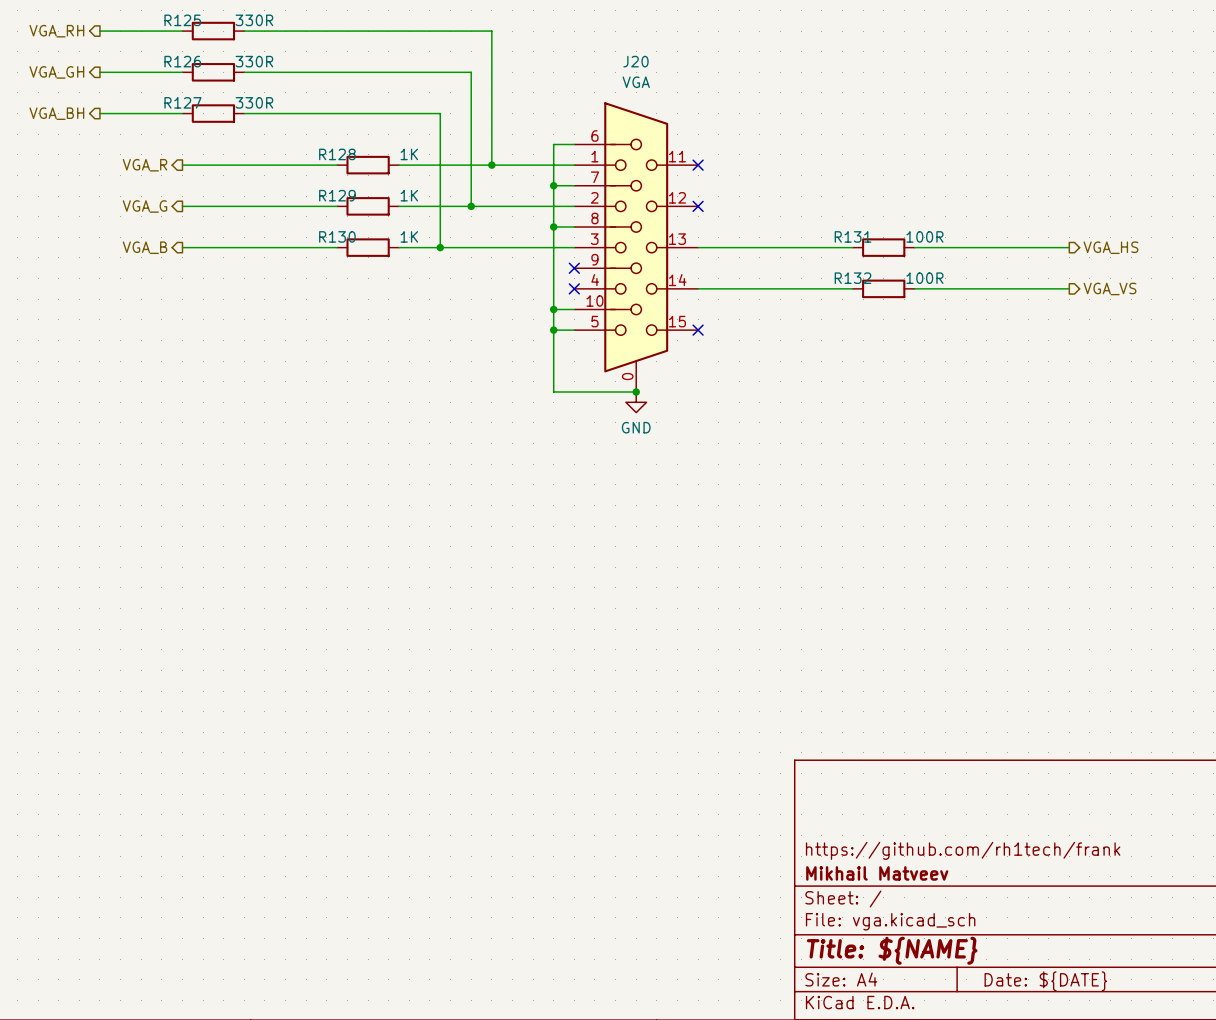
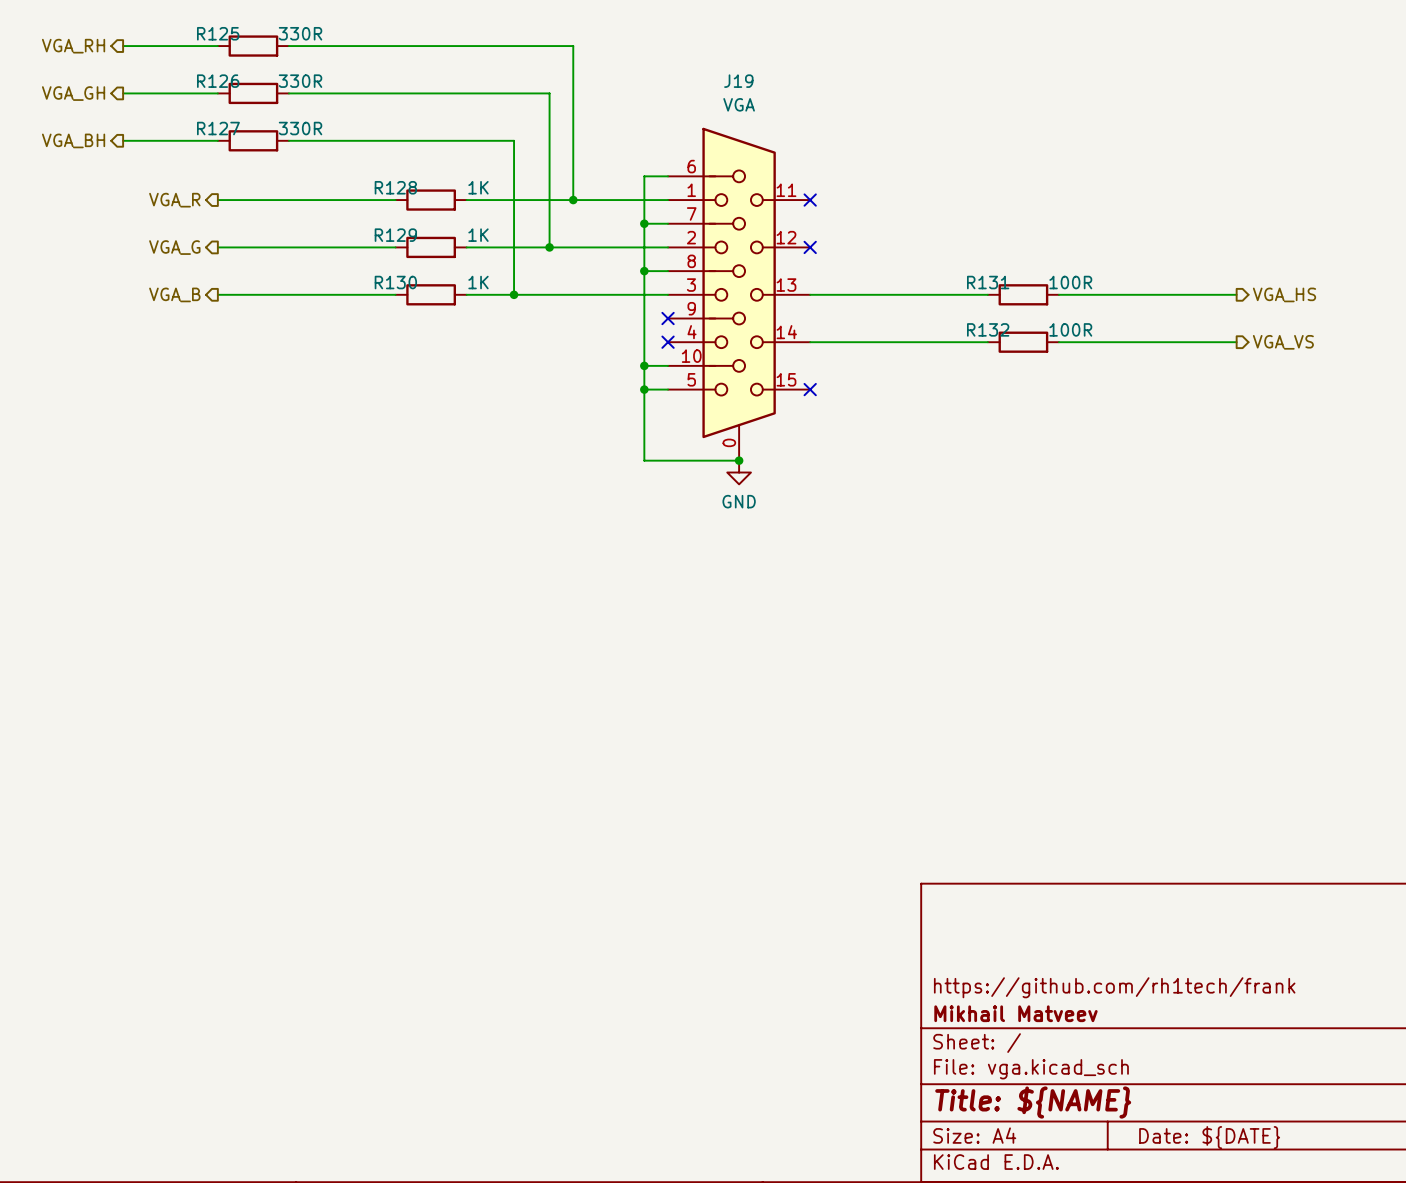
J20 name: J20 (635, 61) -> J19 (738, 81)

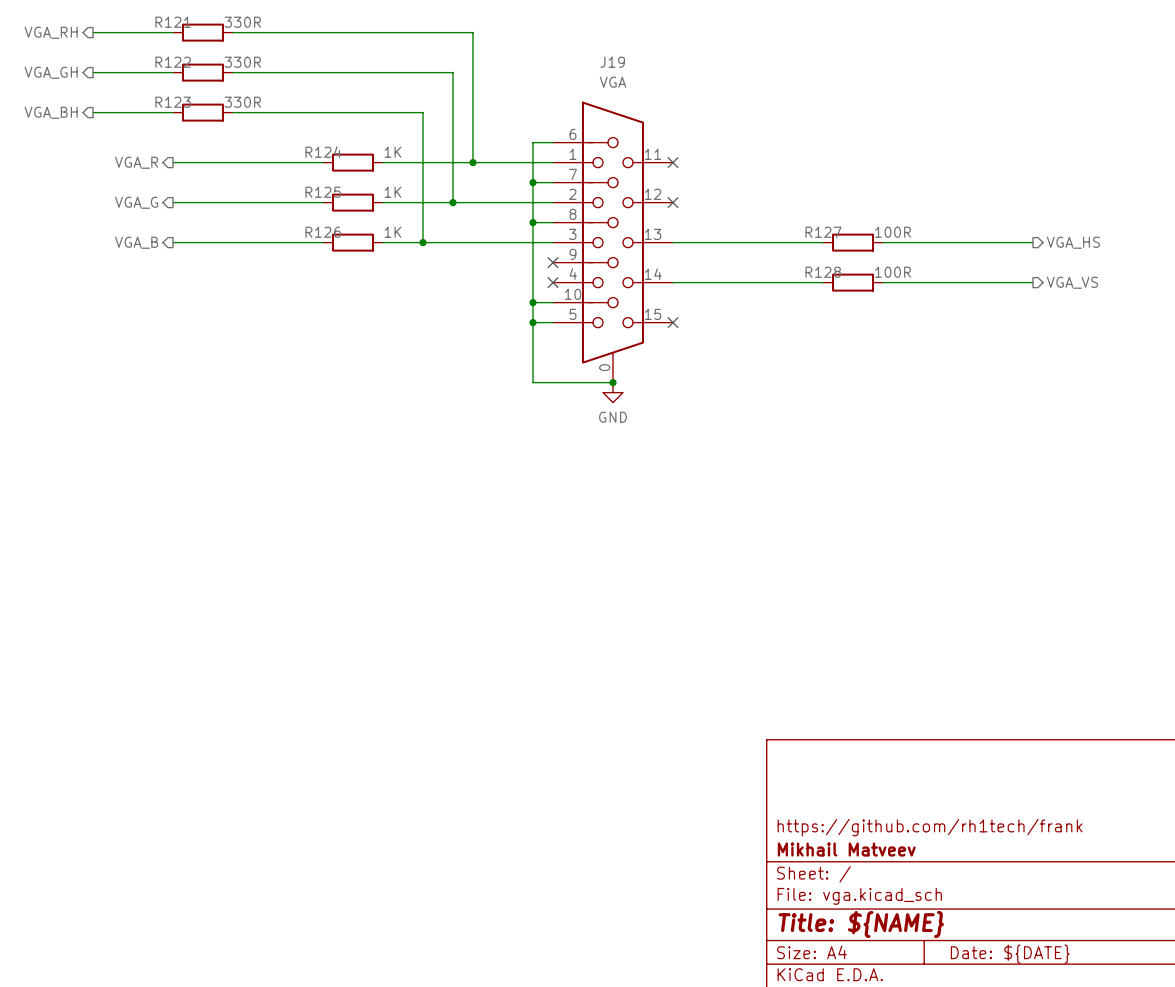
R125 name: R125 (218, 33) -> R121 (173, 22)
R126 name: R126 (218, 81) -> R122 (173, 62)
R127 name: R127 (218, 128) -> R123 (173, 102)
R128 name: R128 (395, 187) -> R124 (323, 152)
R129 name: R129 (395, 235) -> R125 (323, 192)
R130 name: R130 (395, 282) -> R126 (323, 232)
R131 name: R131 (988, 282) -> R127 (823, 232)
R132 name: R132 (988, 329) -> R128 (823, 272)

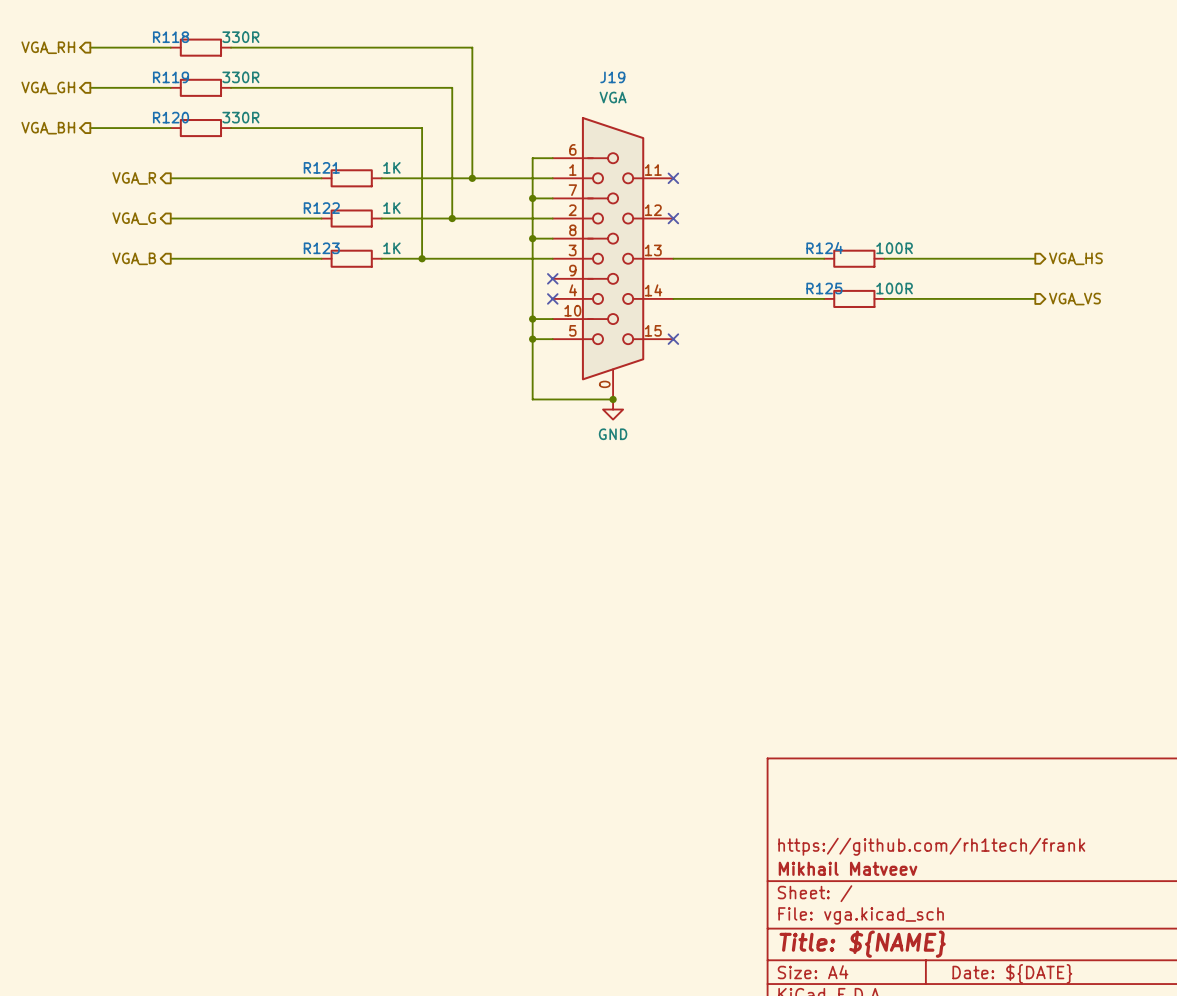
R121 name: R121 (173, 22) -> R118 (171, 37)
R122 name: R122 (173, 62) -> R119 (171, 77)
R123 name: R123 (173, 102) -> R120 (171, 117)
R124 name: R124 (323, 152) -> R121 (321, 167)
R125 name: R125 (323, 192) -> R122 (321, 208)
R126 name: R126 (323, 232) -> R123 (321, 248)
R127 name: R127 (823, 232) -> R124 (824, 248)
R128 name: R128 (823, 272) -> R125 (824, 288)

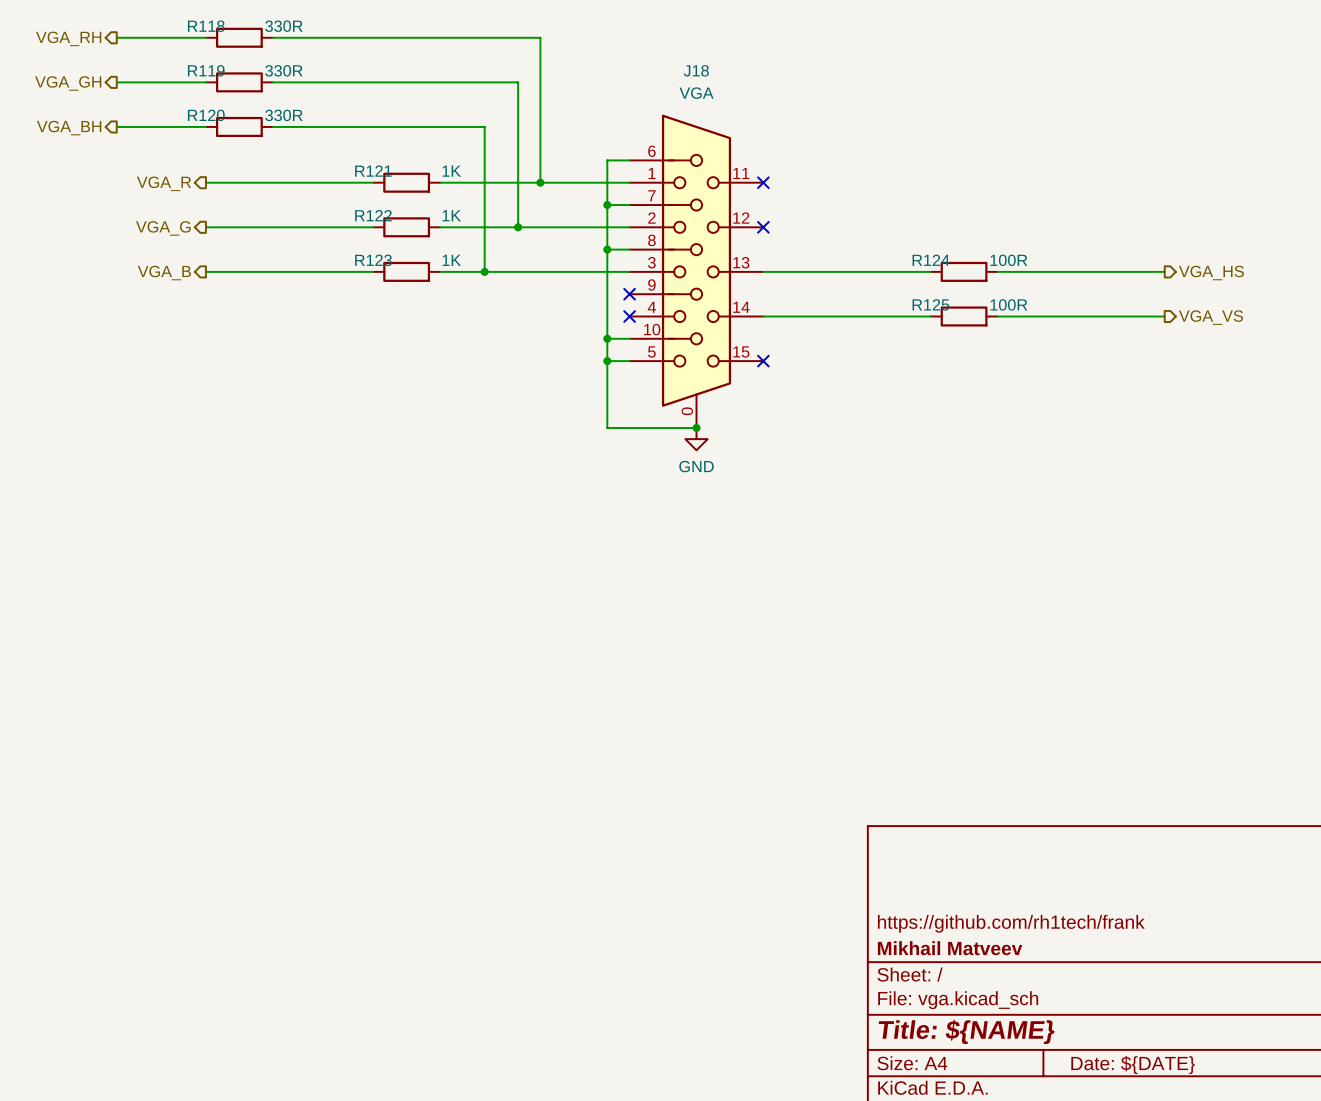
J19 name: J19 (612, 77) -> J18 (696, 70)

